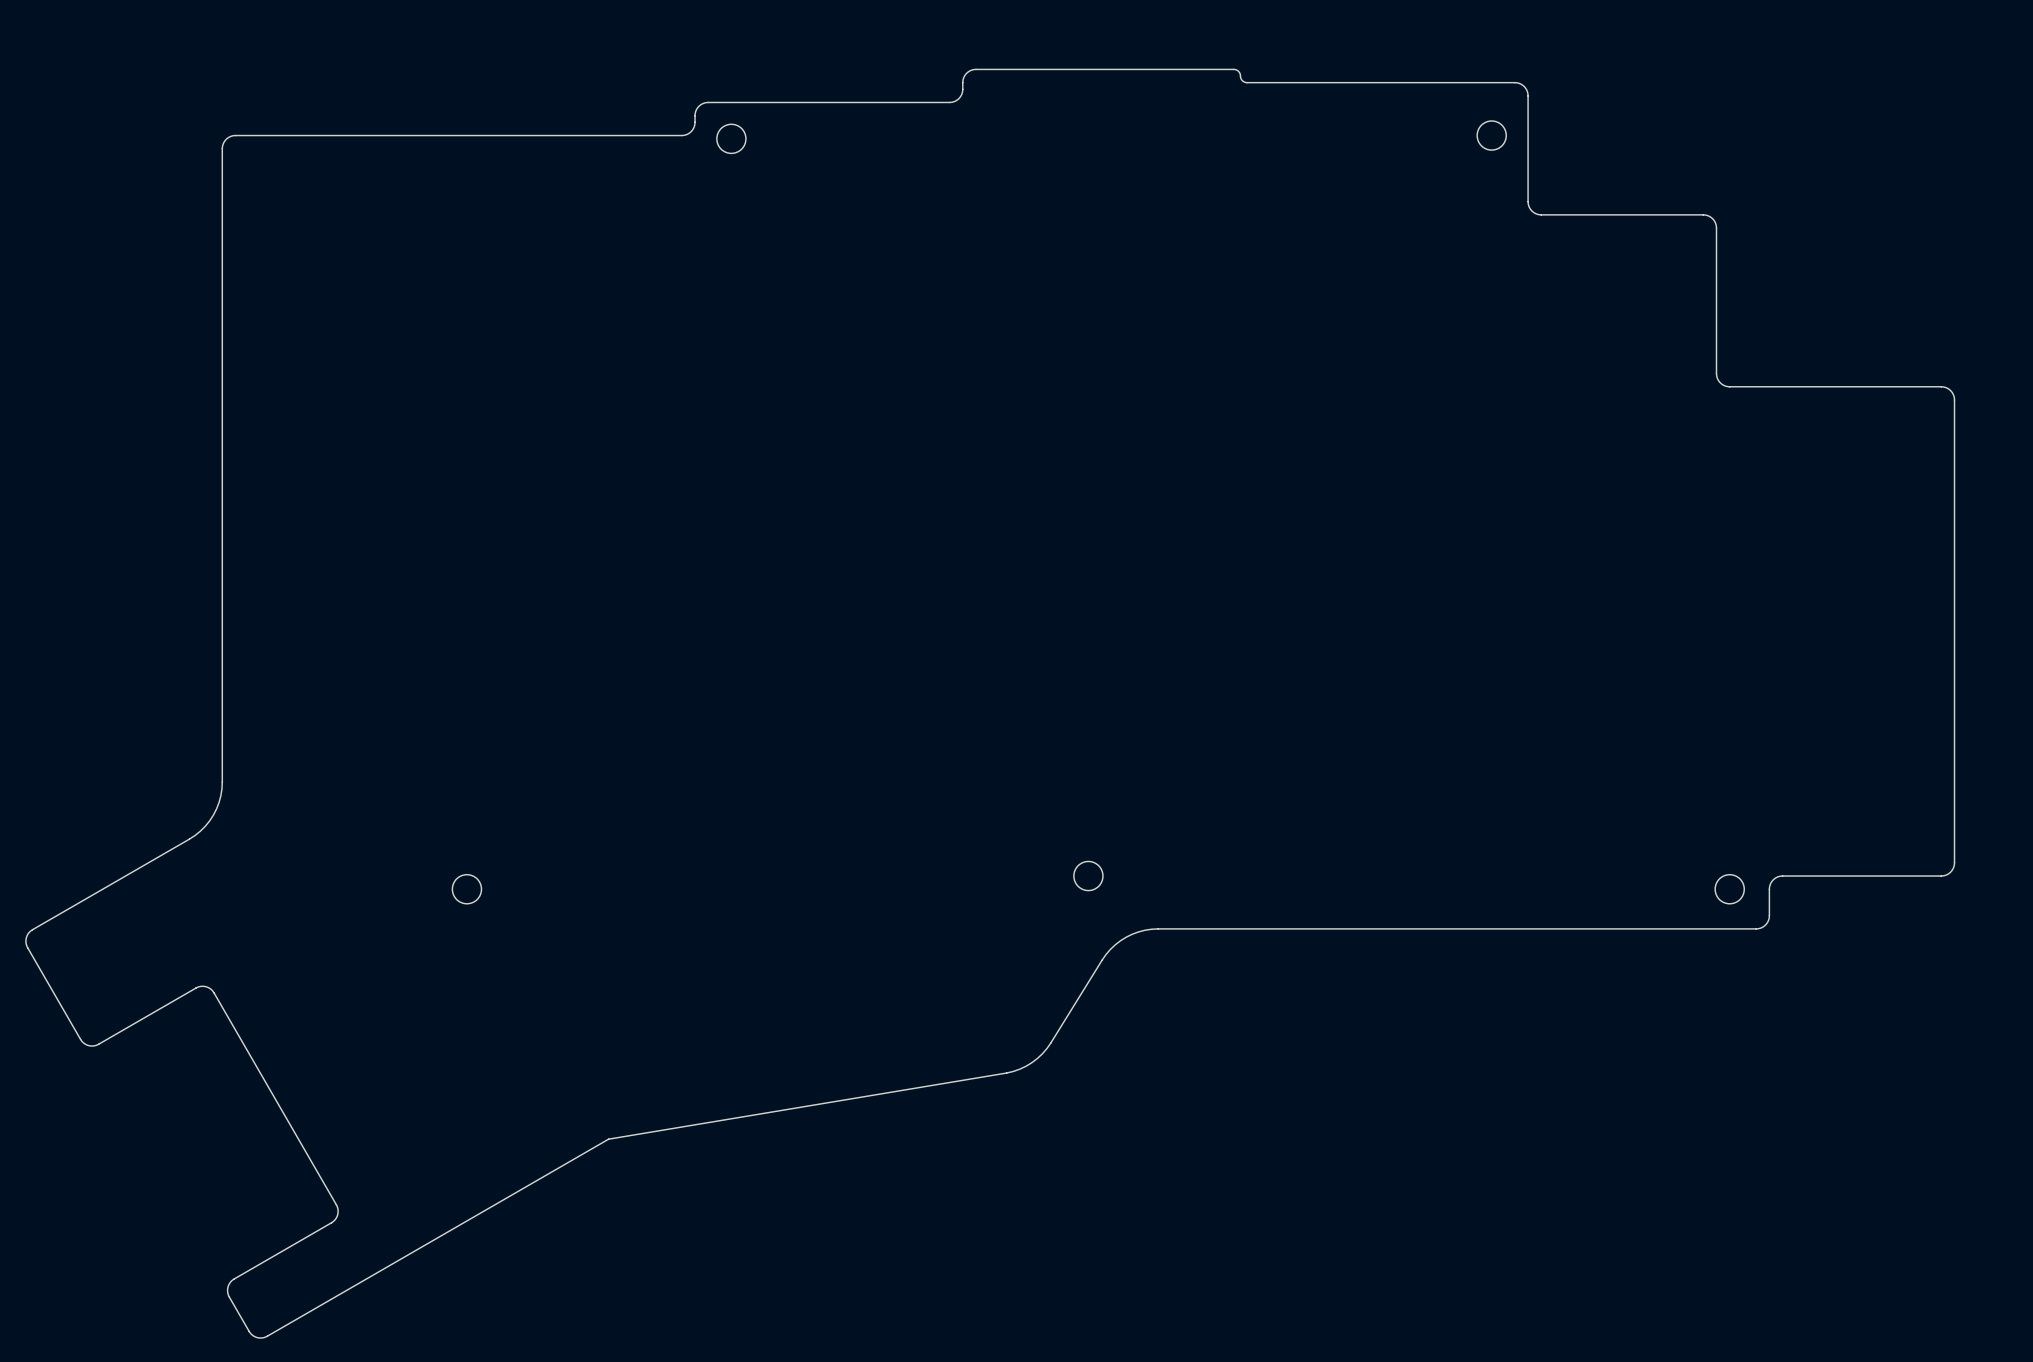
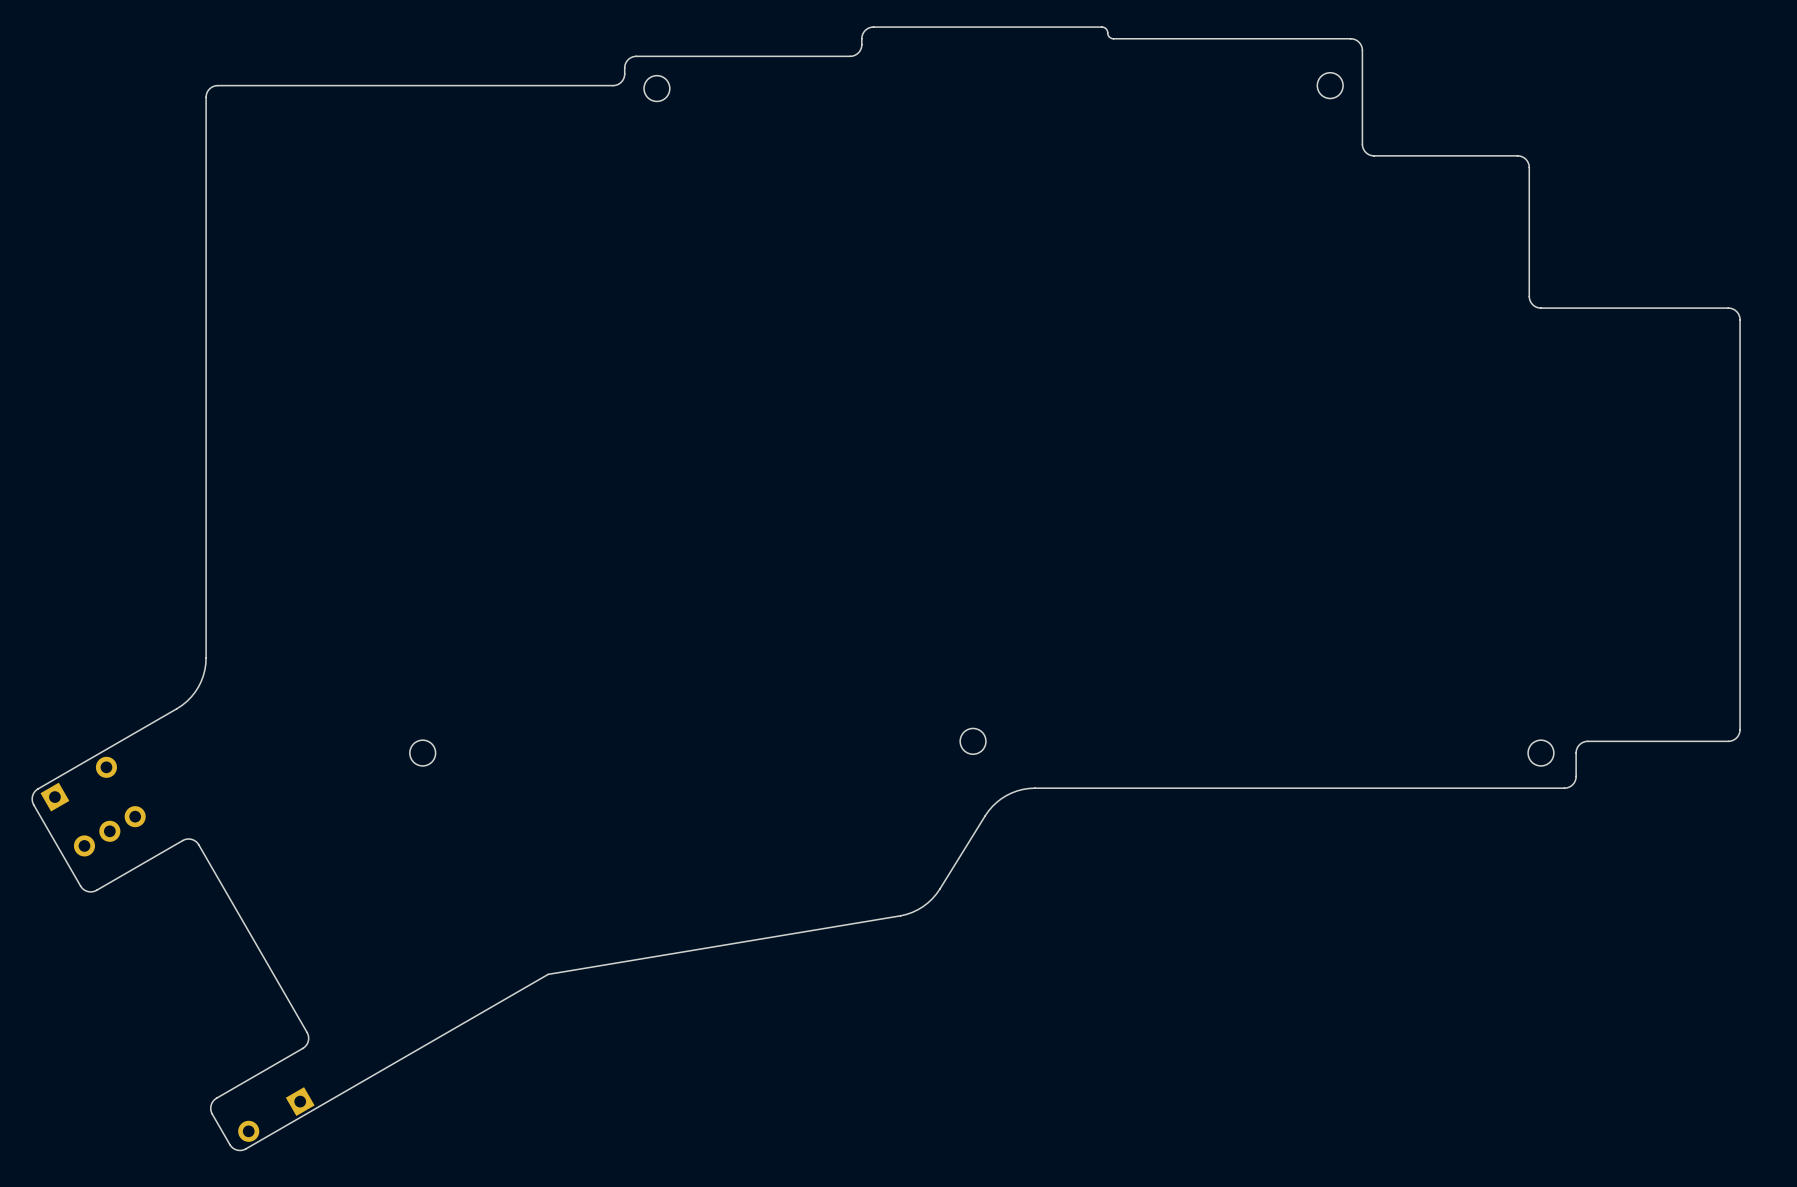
part: none -> (78, 784)
part: none -> (109, 831)
part: none -> (276, 1114)

